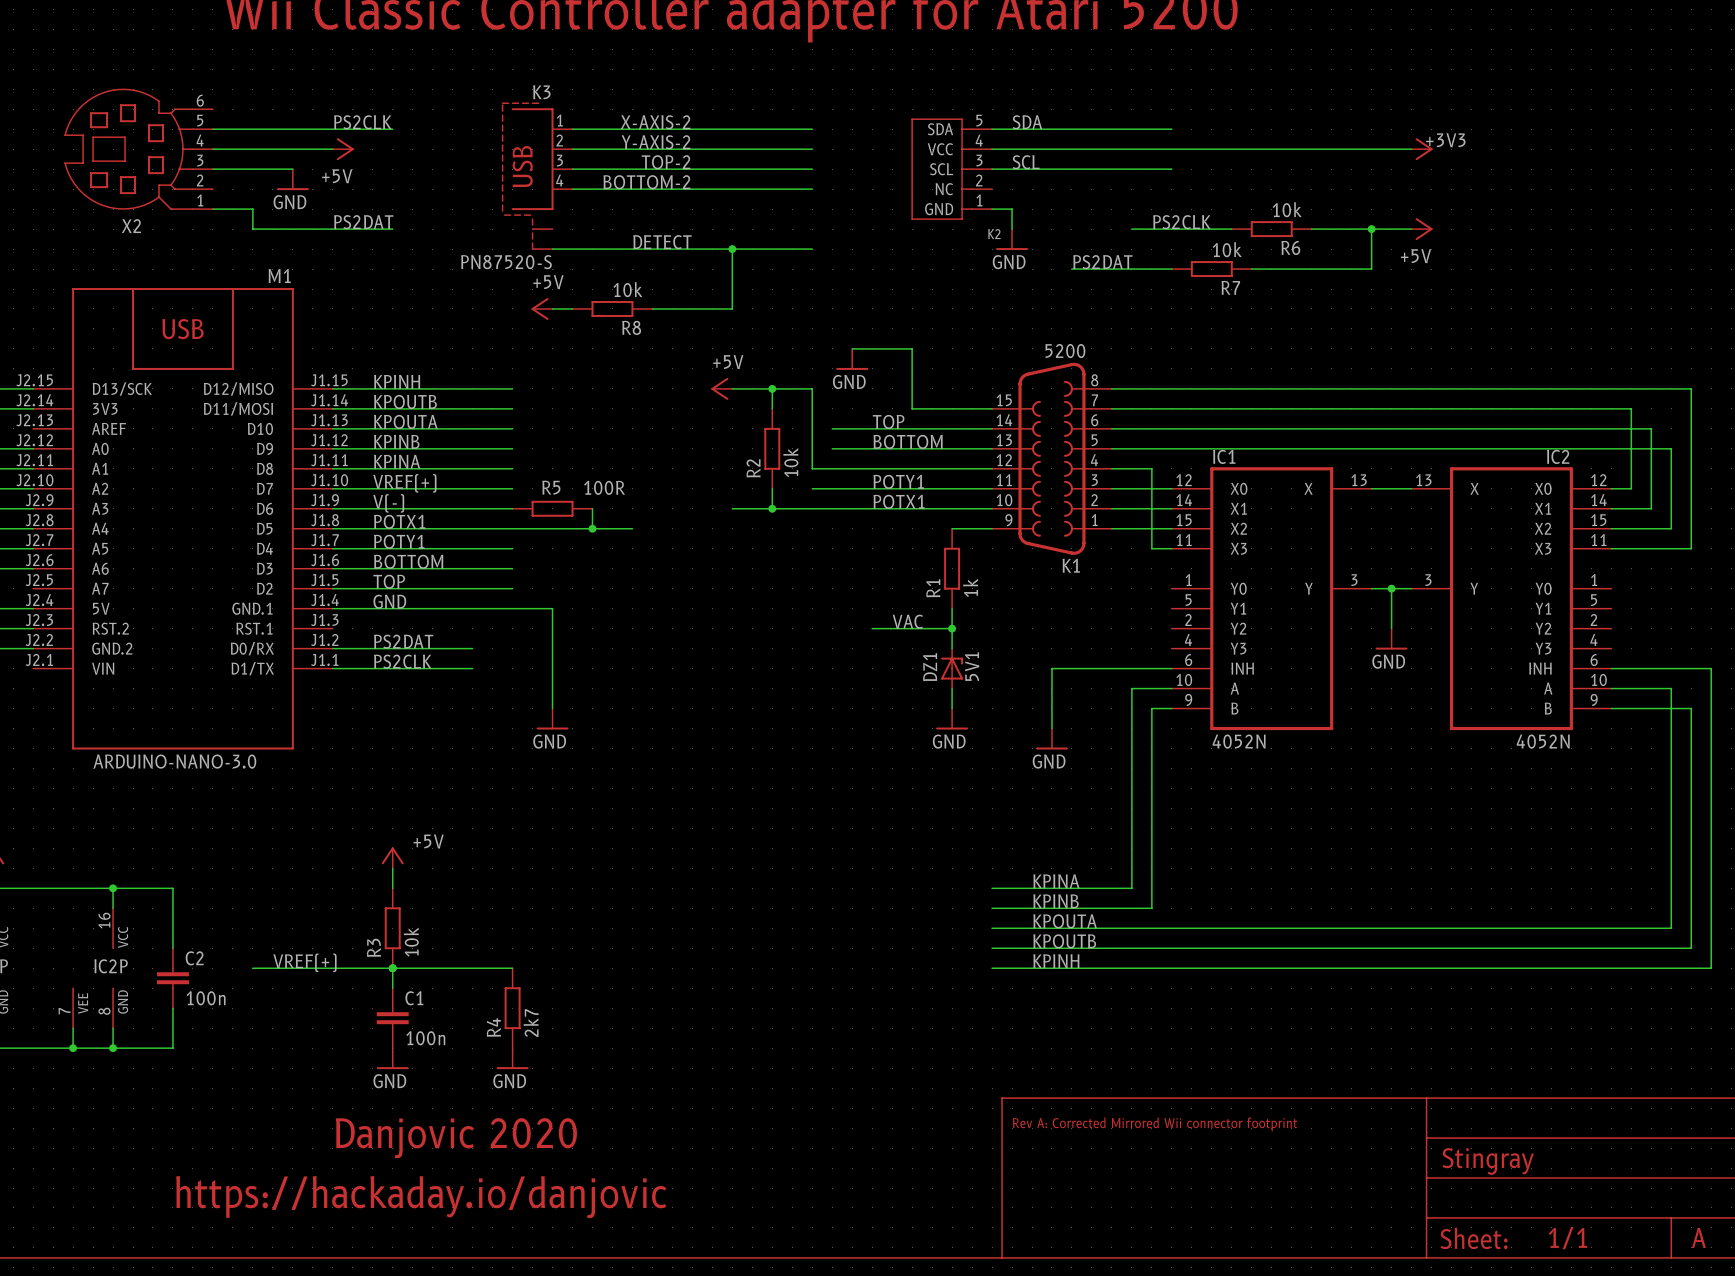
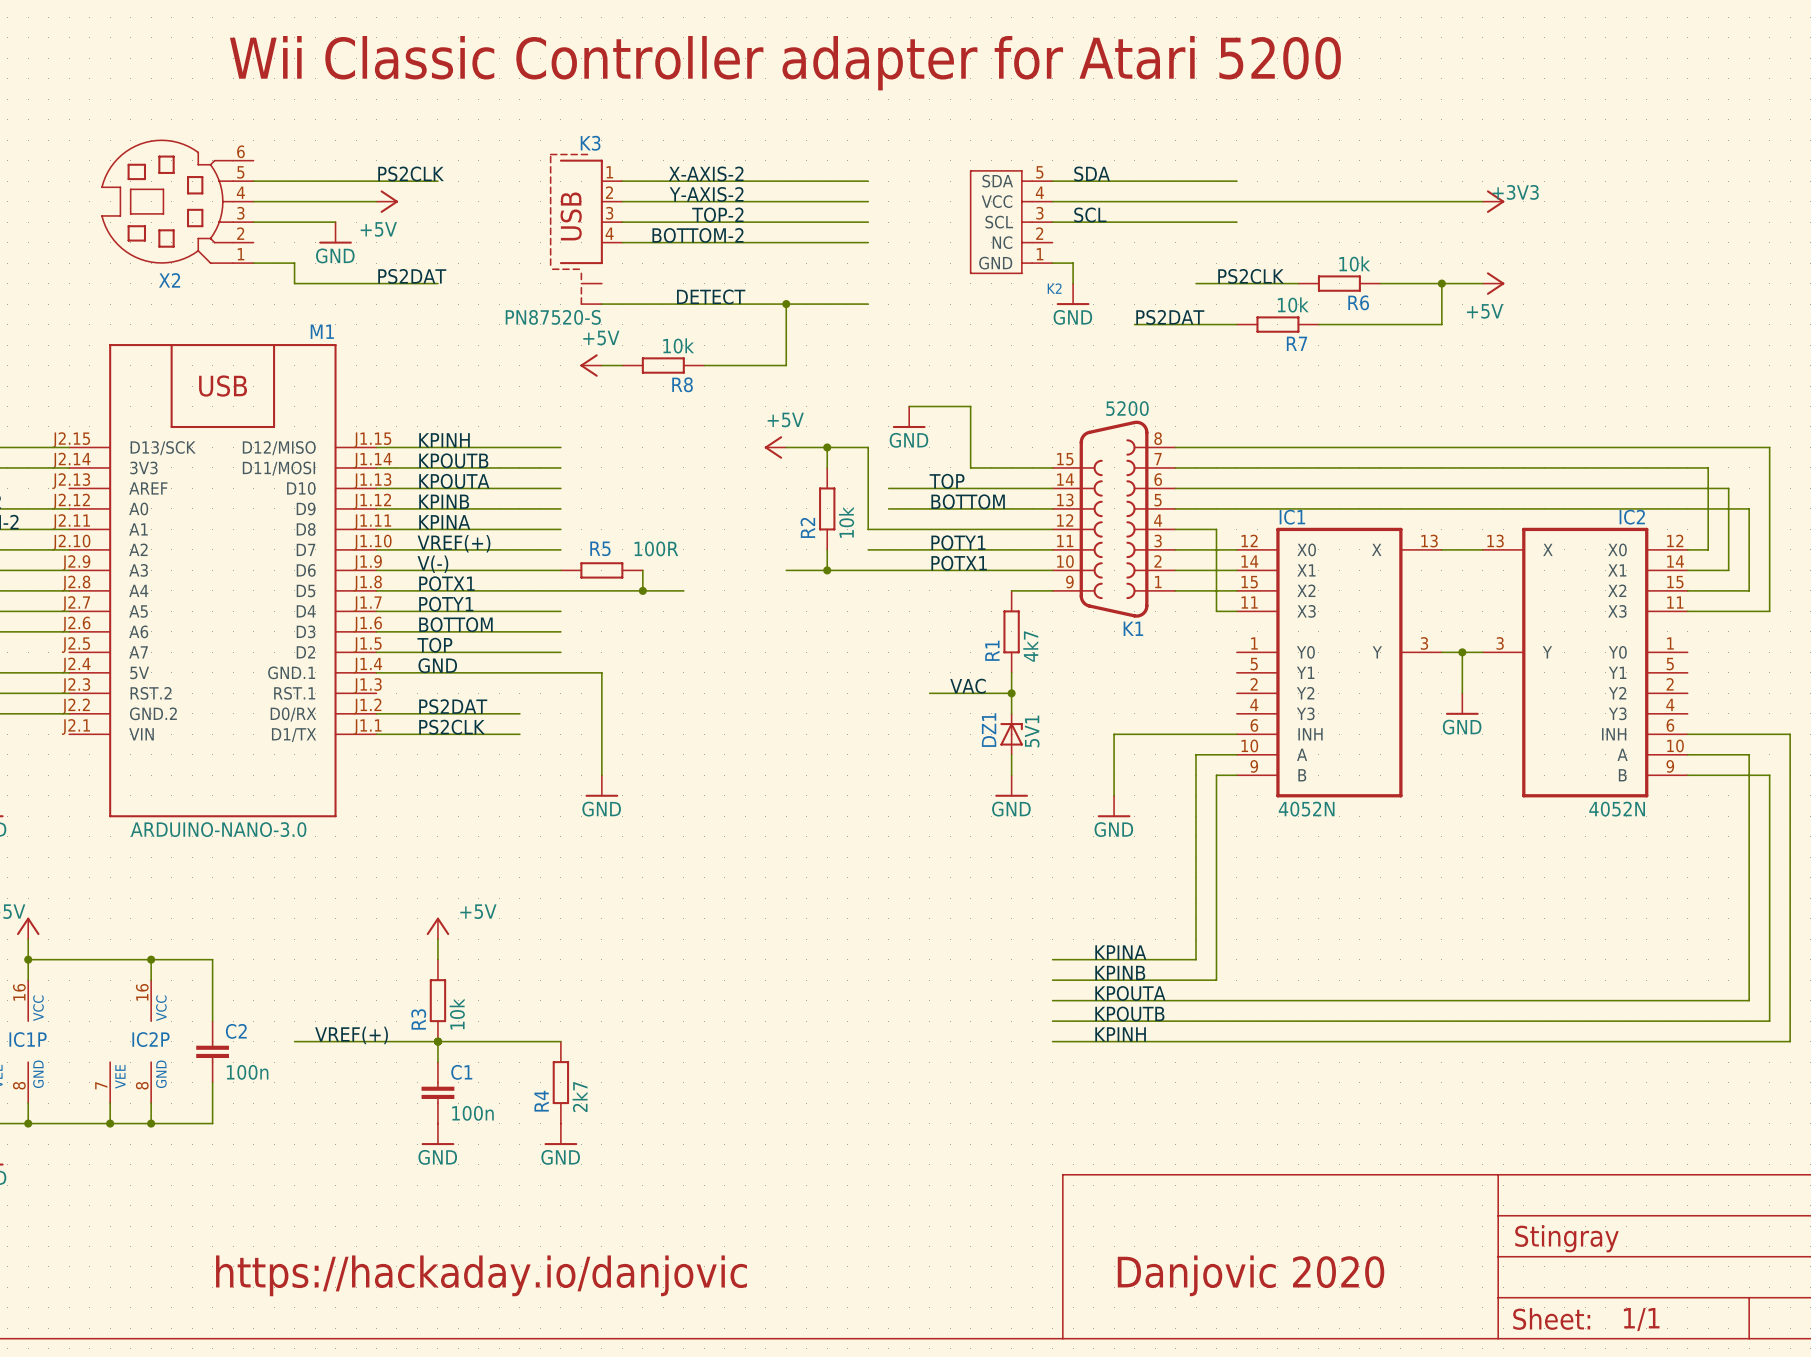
R1 value: 1k (970, 587) -> 4k7 (1030, 646)
text: Rev A: Corrected Mirrored Wii connector footprint (1155, 1124) -> none
text: Danjovic 2020 (456, 1138) -> none
text: none -> Danjovic 2020 (1251, 1275)
text: A (1698, 1237) -> none

